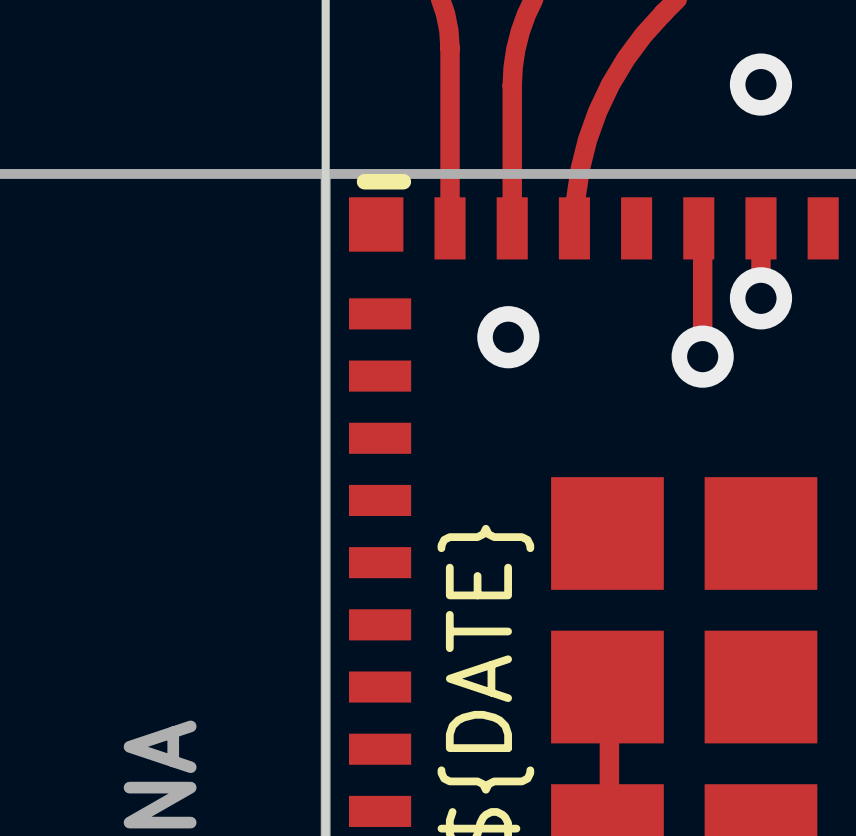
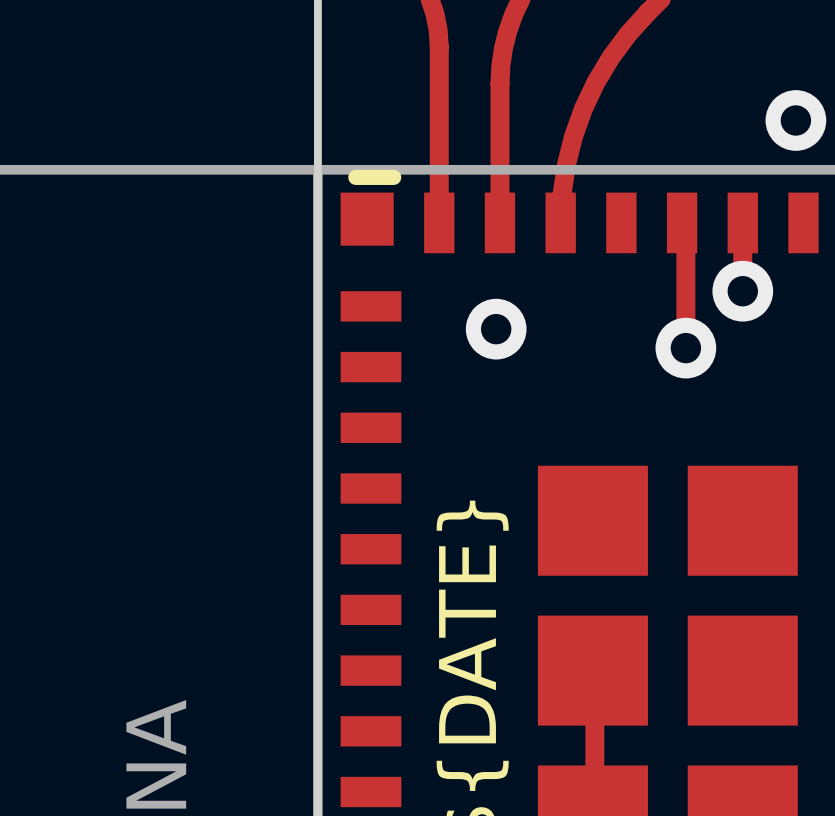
via position: (760, 84) -> (795, 120)

